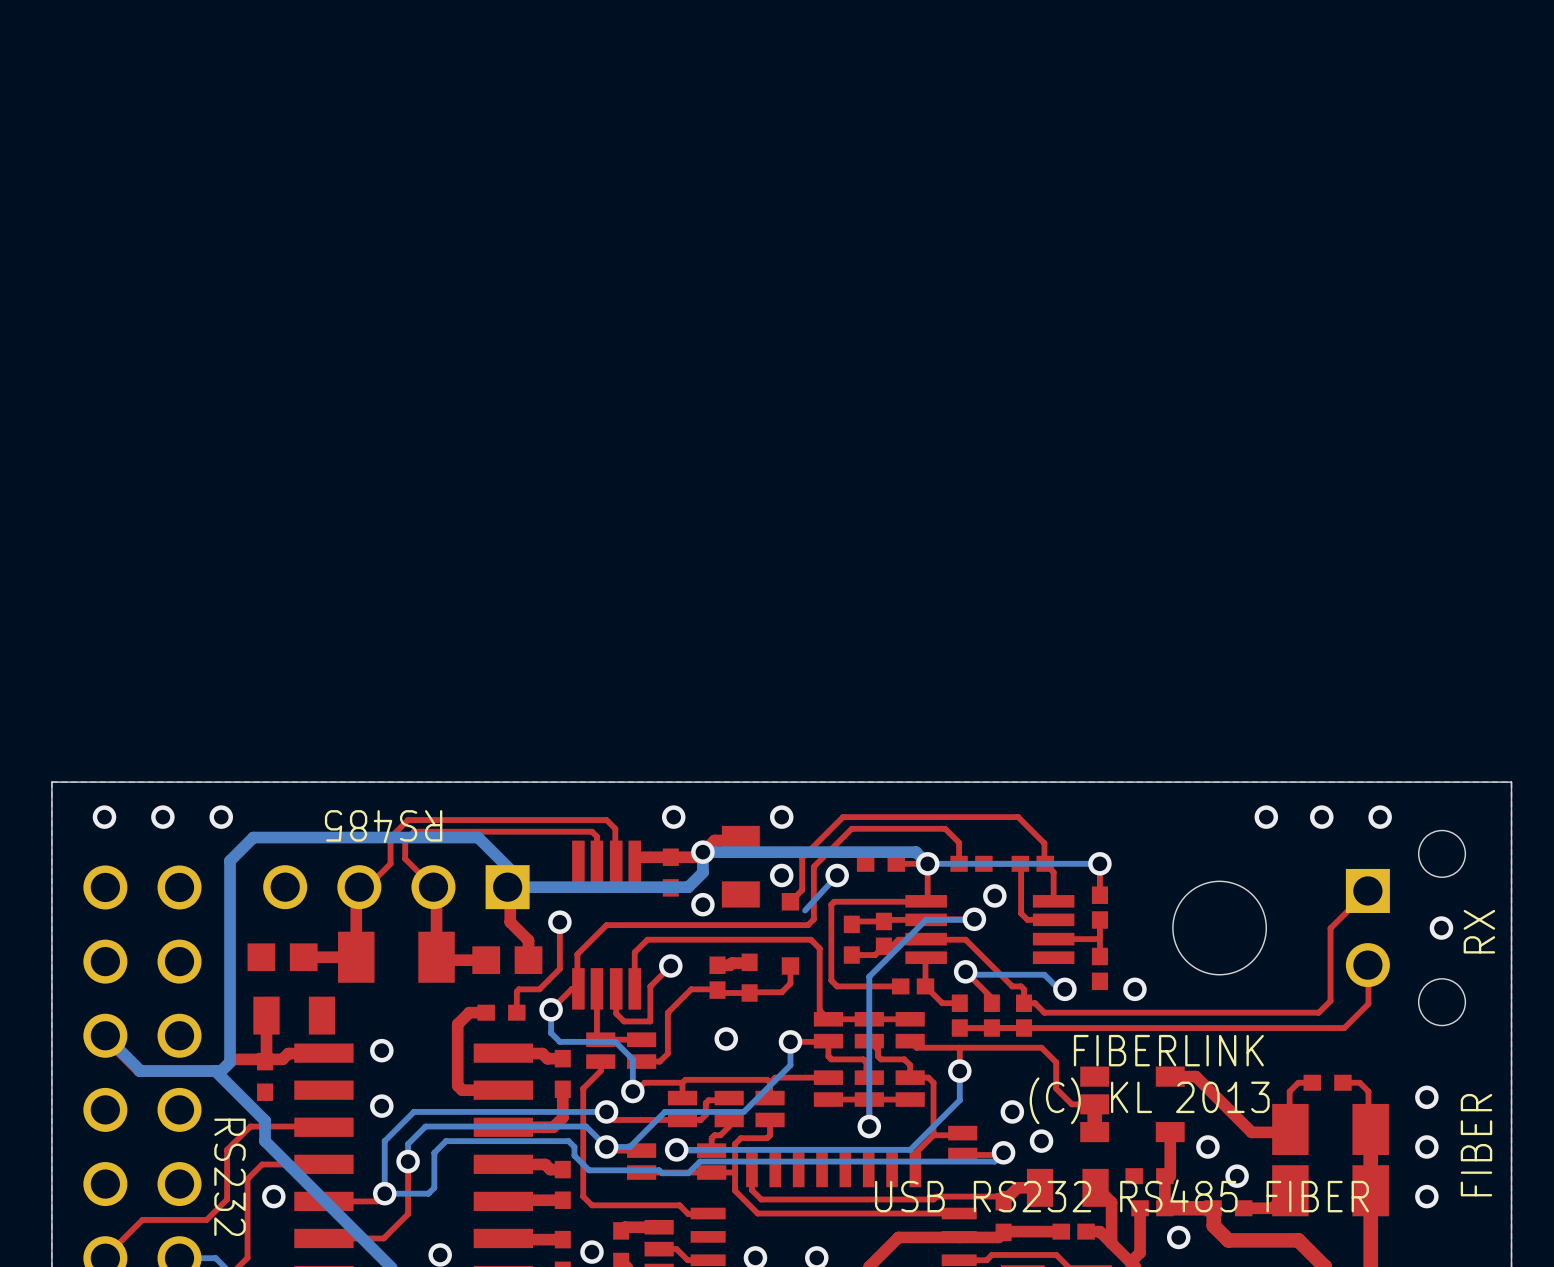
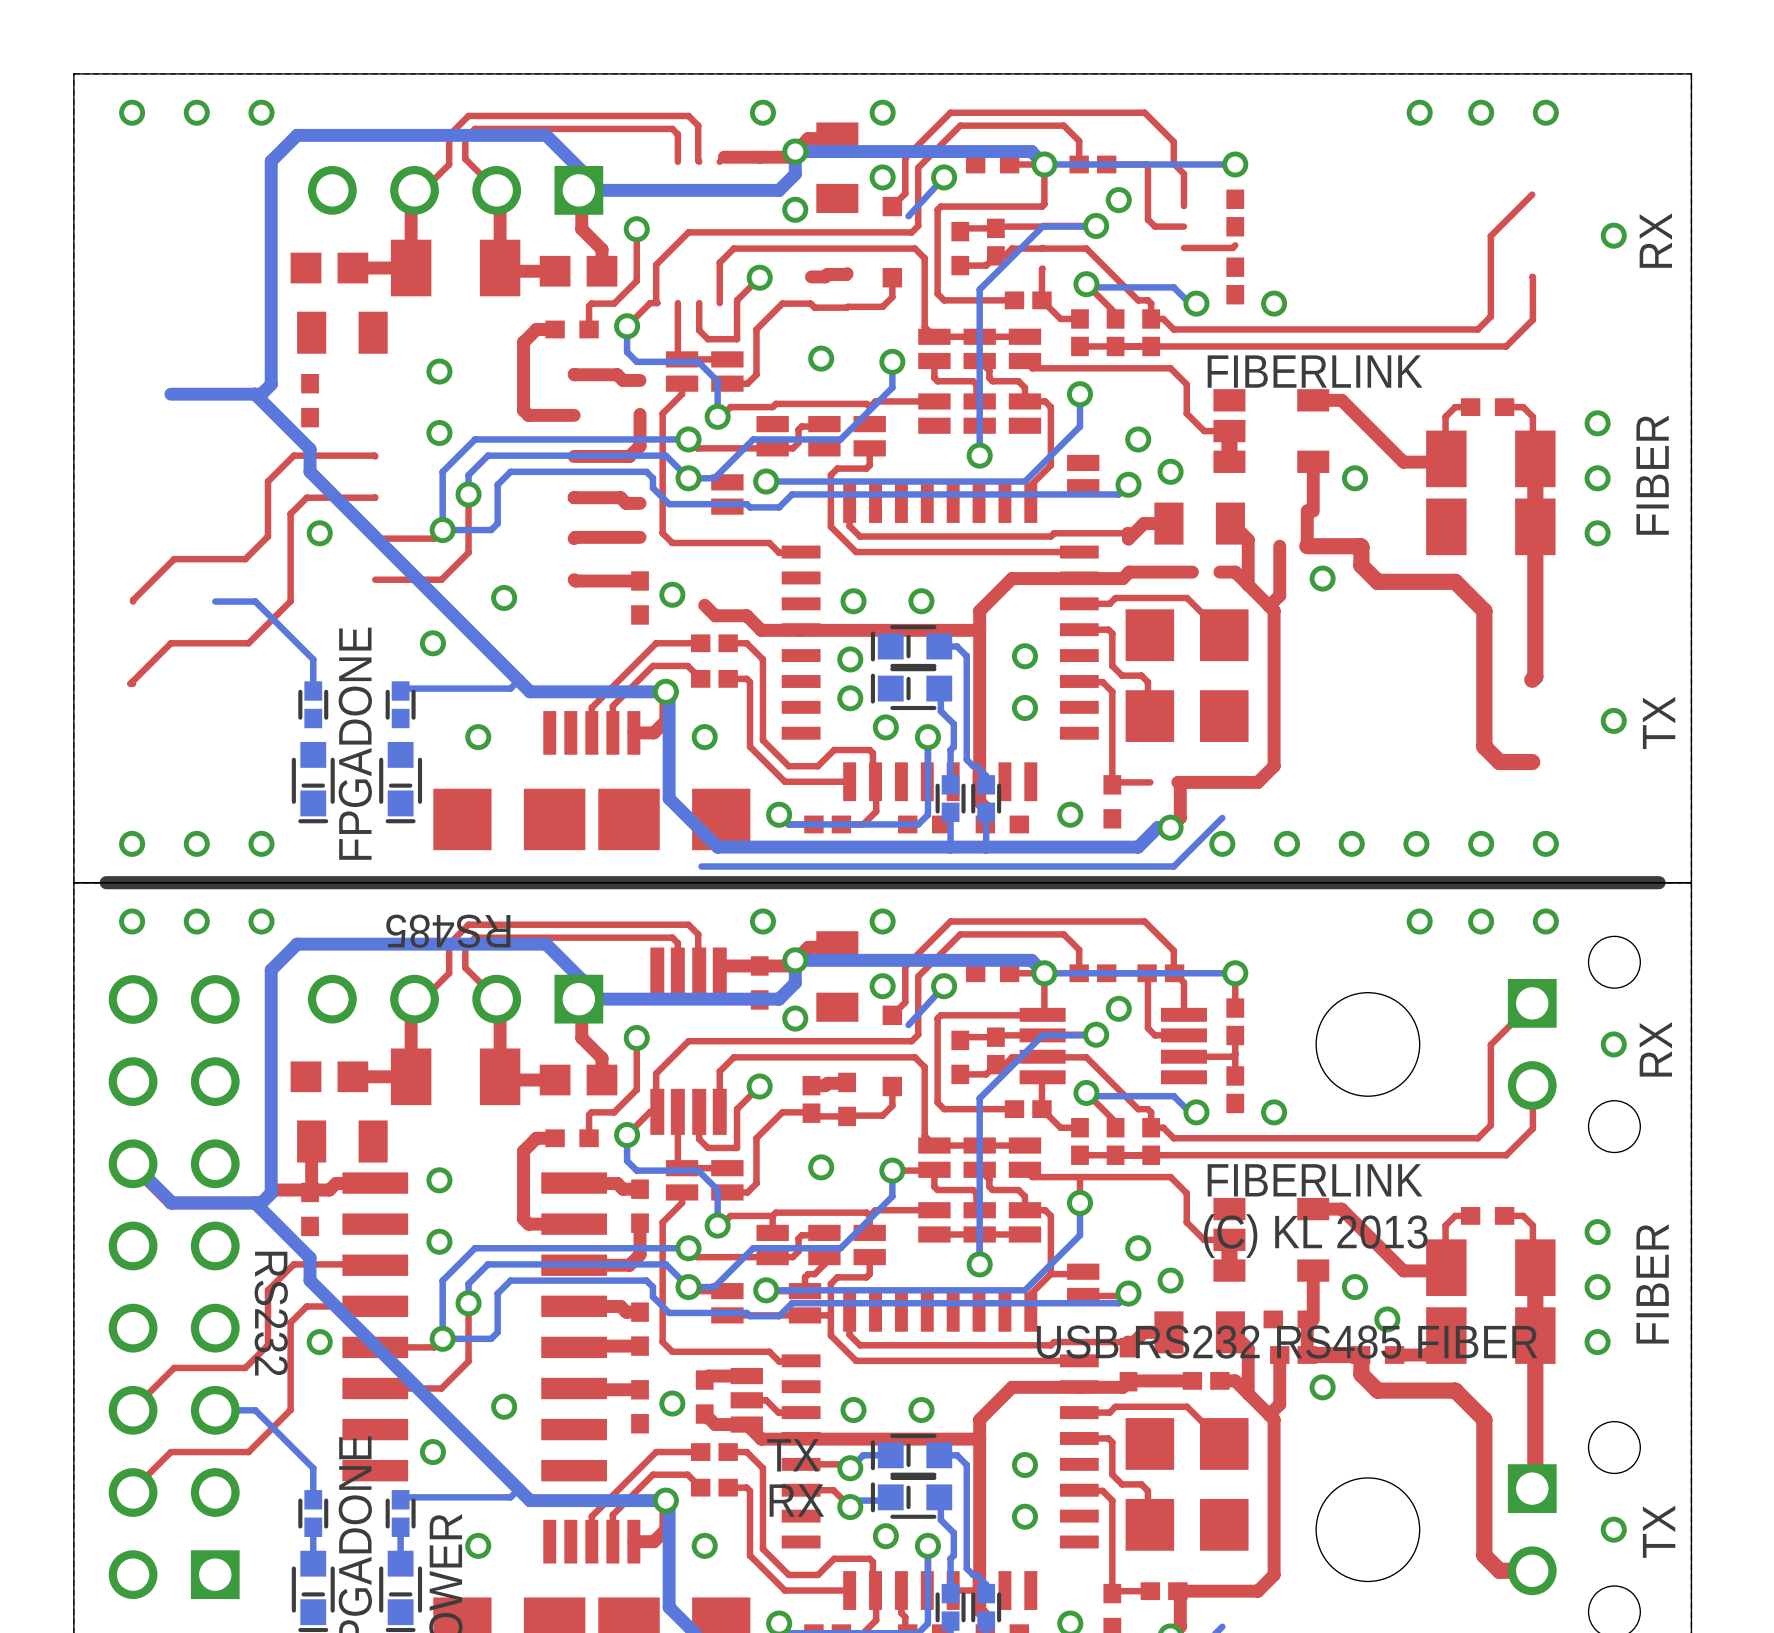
via: none -> (132, 112)
via: none -> (196, 112)
via: none -> (261, 112)
via: none -> (762, 112)
via: none -> (882, 112)
via: none -> (1419, 112)
via: none -> (1481, 112)
via: none -> (1545, 112)
top track: none -> (837, 136) (835, 138) (808, 138) (789, 157) (724, 157) (719, 161)
via: none -> (795, 151)
top track: none -> (677, 161) (677, 134) (672, 128) (475, 128) (465, 138) (465, 158) (500, 193) (500, 268) (503, 271) (555, 271)
top track: none -> (699, 161) (698, 125) (688, 115) (468, 115) (449, 135) (449, 164) (423, 190) (414, 190) (411, 193) (411, 268) (352, 268)
part: none -> (992, 164)
top track: none -> (1009, 164) (1044, 164) (1044, 204) (1042, 206) (940, 206) (937, 209) (937, 293) (944, 300) (1014, 300)
via: none -> (1044, 164)
top track: none -> (1079, 164) (1079, 141) (1063, 125) (960, 125) (918, 167) (918, 225) (911, 232) (688, 232) (656, 264) (657, 303) (650, 303) (627, 326)
part: none -> (1092, 164)
top track: none -> (1106, 164) (1147, 164) (1147, 219) (1155, 226) (1183, 226)
bottom track: none -> (1235, 164) (1044, 164) (1031, 151) (795, 151) (795, 174) (779, 190) (578, 190)
via: none -> (1235, 164)
part: none -> (837, 167)
via: none -> (882, 177)
bottom track: none -> (944, 177) (908, 216)
via: none -> (944, 177)
part: none -> (455, 190)
top track: none -> (578, 190) (581, 193) (581, 229) (602, 249) (602, 271)
bottom track: none -> (581, 190) (581, 170) (546, 135) (297, 135) (271, 161) (271, 384) (261, 394) (170, 394)
top track: none -> (1532, 194) (1490, 235) (1490, 316) (1477, 329) (1173, 329) (1163, 318) (1151, 318) (1151, 303) (1147, 300) (1138, 300) (1086, 248) (1012, 248) (1004, 255) (995, 255) (986, 265) (960, 265)
via: none -> (1118, 200)
top track: none -> (1183, 206) (1183, 173) (1173, 163) (1173, 141) (1144, 112) (950, 112) (905, 158) (905, 193) (892, 206)
via: none -> (795, 209)
part: none -> (1235, 213)
top track: none -> (1096, 225) (997, 226) (995, 228) (963, 228) (960, 231)
bottom track: none -> (1096, 225) (1042, 226) (979, 289) (979, 455)
via: none -> (1096, 225)
top track: none -> (636, 229) (636, 280) (614, 303) (591, 303) (589, 306) (589, 329)
via: none -> (636, 229)
via: none -> (1613, 235)
text: none -> RX (1655, 240)
part: none -> (892, 242)
part: none -> (995, 242)
top track: none -> (1235, 245) (1232, 247) (1183, 247)
part: none -> (960, 248)
part: none -> (329, 268)
part: none -> (455, 268)
top track: none -> (1042, 268) (1041, 300) (1060, 318) (1079, 318)
part: none -> (578, 271)
top track: none -> (847, 273) (811, 276)
top track: none -> (1532, 276) (1532, 319) (1506, 346) (1079, 346)
top track: none -> (759, 277) (737, 300) (737, 339) (707, 339) (699, 330) (699, 303)
via: none -> (759, 277)
top track: none -> (892, 277) (892, 297) (882, 306) (814, 307) (810, 303) (782, 303) (756, 329) (756, 374) (747, 383) (727, 383)
part: none -> (1235, 280)
top track: none -> (1086, 284) (1115, 313) (1115, 318)
via: none -> (1086, 284)
bottom track: none -> (1086, 287) (1173, 287) (1189, 303)
part: none -> (1028, 300)
top track: none -> (677, 303) (677, 355) (682, 359) (727, 359)
top track: none -> (719, 303) (719, 262) (733, 248) (915, 248) (924, 258) (924, 327) (934, 336) (1024, 336)
via: none -> (1196, 303)
via: none -> (1274, 303)
bottom track: none -> (627, 326) (627, 352) (636, 361) (698, 361) (717, 381) (717, 416)
via: none -> (627, 326)
top track: none -> (555, 329) (536, 329) (523, 342) (523, 410) (528, 415) (574, 415)
part: none -> (572, 329)
part: none -> (342, 332)
part: none -> (1079, 332)
part: none -> (1115, 332)
part: none -> (1151, 332)
part: none -> (934, 348)
part: none -> (979, 348)
part: none -> (1024, 348)
via: none -> (821, 358)
top track: none -> (934, 361) (934, 378) (937, 381) (973, 381) (976, 384) (976, 398) (979, 401)
top track: none -> (979, 361) (989, 370) (989, 378) (992, 381) (1018, 381) (1024, 387) (1024, 401) (1045, 401) (1050, 407) (1050, 465) (1030, 485) (1030, 503)
top track: none -> (1024, 361) (1032, 368) (1170, 368) (1186, 384) (1186, 413) (1204, 431) (1229, 431) (1229, 461)
bottom track: none -> (892, 361) (892, 387) (840, 439) (753, 439) (714, 478) (688, 478) (665, 455) (487, 455) (468, 475) (468, 494)
via: none -> (892, 361)
via: none -> (439, 371)
part: none -> (682, 371)
part: none -> (727, 371)
text: none -> FIBERLINK (1315, 371)
top track: none -> (574, 374) (617, 374) (623, 380) (640, 380)
top track: none -> (682, 383) (682, 394) (662, 413) (662, 533) (672, 543) (769, 543) (779, 552) (801, 552)
bottom track: none -> (255, 394) (310, 449) (310, 471) (530, 691) (665, 691) (669, 695) (669, 798) (717, 847) (1138, 847) (1157, 827) (1170, 827)
bottom track: none -> (1079, 394) (1079, 426) (1024, 481) (766, 481)
via: none -> (1079, 394)
top track: none -> (1313, 400) (1341, 400) (1403, 462) (1443, 462) (1446, 458) (1445, 416) (1455, 407) (1470, 407)
part: none -> (310, 400)
top track: none -> (934, 401) (875, 401) (869, 407) (866, 403) (775, 403) (772, 407) (730, 407) (720, 416) (717, 416)
part: none -> (1487, 407)
top track: none -> (1504, 407) (1523, 407) (1532, 416) (1532, 456) (1535, 458) (1535, 676) (1532, 679)
part: none -> (934, 413)
part: none -> (979, 413)
part: none -> (1024, 413)
top track: none -> (640, 414) (640, 445) (629, 456) (574, 456)
via: none -> (717, 416)
via: none -> (1597, 423)
top track: none -> (824, 424) (821, 426) (801, 426) (798, 429) (798, 442) (792, 448) (697, 448) (688, 439)
part: none -> (1271, 431)
via: none -> (439, 433)
part: none -> (772, 436)
part: none -> (824, 436)
part: none -> (869, 436)
bottom track: none -> (688, 439) (475, 439) (442, 471) (442, 530) (491, 530) (497, 523) (497, 484) (510, 471) (646, 471) (652, 478) (652, 488) (669, 504) (746, 504) (750, 507) (779, 507) (792, 494) (1118, 494) (1128, 484)
via: none -> (688, 439)
via: none -> (1138, 439)
top track: none -> (869, 448) (869, 465) (866, 468) (837, 468) (830, 475) (830, 526) (856, 552) (1079, 552)
via: none -> (979, 455)
top track: none -> (375, 456) (293, 455) (267, 481) (267, 536) (245, 559) (174, 559) (133, 601)
part: none -> (1490, 458)
top track: none -> (1313, 461) (1313, 511) (1307, 510) (1307, 546) (1360, 546) (1361, 565) (1377, 581) (1455, 581) (1484, 610) (1484, 746) (1499, 762) (1532, 762)
via: none -> (1170, 471)
part: none -> (1083, 475)
text: none -> FIBER (1652, 475)
via: none -> (688, 478)
via: none -> (1354, 478)
via: none -> (1597, 478)
via: none -> (766, 481)
via: none -> (1128, 484)
top track: none -> (468, 494) (468, 552) (441, 579) (375, 579)
via: none -> (468, 494)
part: none -> (727, 494)
top track: none -> (375, 497) (306, 497) (290, 513) (290, 601) (248, 643) (170, 643) (130, 683) (133, 683)
top track: none -> (574, 497) (620, 497) (626, 503) (640, 503)
top track: none -> (849, 503) (849, 526) (860, 536) (1050, 536) (1054, 533) (1127, 533) (1128, 538) (1143, 523) (1168, 523)
part: none -> (1199, 523)
top track: none -> (1230, 523) (1248, 539) (1248, 585)
part: none -> (1490, 526)
top track: none -> (442, 530) (434, 538) (375, 538)
via: none -> (442, 530)
via: none -> (319, 533)
via: none -> (1597, 533)
top track: none -> (640, 537) (574, 538)
top track: none -> (1279, 546) (1279, 595) (1269, 606)
top track: none -> (1192, 572) (1129, 572) (1122, 578) (1012, 578) (979, 610) (979, 801) (986, 808) (985, 824)
top track: none -> (1219, 572) (1235, 572) (1274, 610) (1274, 766) (1257, 782) (1177, 782)
via: none -> (1322, 578)
top track: none -> (574, 579) (640, 581)
via: none -> (672, 594)
via: none -> (504, 597)
part: none -> (640, 597)
bottom track: none -> (215, 601) (255, 601) (313, 659) (313, 691)
via: none -> (853, 601)
via: none -> (921, 601)
top track: none -> (1079, 603) (1109, 603) (1115, 597) (1187, 597) (1224, 635)
top track: none -> (704, 605) (715, 615) (746, 615) (761, 630) (979, 630)
top track: none -> (1079, 629) (1108, 629) (1112, 633) (1112, 665) (1122, 675) (1141, 675) (1147, 682) (1147, 714) (1149, 716)
part: none -> (940, 642)
via: none -> (432, 643)
top track: none -> (700, 643) (656, 643) (591, 707) (591, 732)
part: none -> (714, 643)
top track: none -> (728, 643) (746, 643) (762, 659) (762, 740) (788, 766) (817, 766) (834, 750) (869, 750) (872, 753) (872, 779) (876, 782) (876, 811) (863, 824) (841, 824)
part: none -> (911, 646)
bottom track: none -> (939, 646) (957, 646) (966, 656) (966, 759) (986, 775) (986, 784)
via: none -> (1024, 656)
via: none -> (850, 659)
part: none -> (1187, 675)
top track: none -> (700, 678) (687, 665) (652, 665) (612, 706) (612, 732)
part: none -> (714, 678)
top track: none -> (728, 678) (746, 678) (750, 682) (750, 746) (784, 781) (849, 781)
bottom track: none -> (518, 680) (510, 688) (403, 688) (400, 691)
top track: none -> (1079, 681) (1102, 682) (1112, 691) (1112, 784) (1114, 782) (1150, 782)
part: none -> (911, 688)
bottom track: none -> (939, 688) (940, 711) (953, 724) (953, 746) (950, 750) (950, 784)
top track: none -> (665, 691) (665, 720) (653, 732) (633, 732)
via: none -> (665, 691)
via: none -> (850, 698)
part: none -> (313, 704)
part: none -> (400, 704)
via: none -> (1024, 707)
via: none -> (1613, 720)
text: none -> TX (1659, 722)
via: none -> (885, 727)
via: none -> (478, 737)
via: none -> (704, 737)
bottom track: none -> (927, 737) (927, 814) (918, 824) (788, 824) (779, 814)
via: none -> (927, 737)
text: none -> FPGADONE (355, 743)
part: none -> (591, 780)
part: none -> (313, 782)
part: none -> (400, 782)
top track: none -> (1180, 782) (1180, 817) (1170, 827)
part: none -> (950, 798)
part: none -> (986, 798)
part: none -> (1112, 801)
bottom track: none -> (950, 812) (950, 847)
bottom track: none -> (986, 812) (986, 847)
via: none -> (779, 814)
via: none -> (1070, 814)
bottom track: none -> (1222, 817) (1173, 866) (701, 866)
part: none -> (827, 824)
part: none -> (924, 824)
part: none -> (1002, 824)
via: none -> (1170, 827)
via: none -> (132, 843)
via: none -> (196, 843)
via: none -> (261, 843)
via: none -> (1222, 843)
via: none -> (1287, 843)
via: none -> (1351, 843)
via: none -> (1416, 843)
via: none -> (1481, 843)
via: none -> (1545, 843)
line: none -> (1659, 882) (106, 882)
board edge: none -> (1691, 882) (1691, 73) (73, 73) (73, 882)

